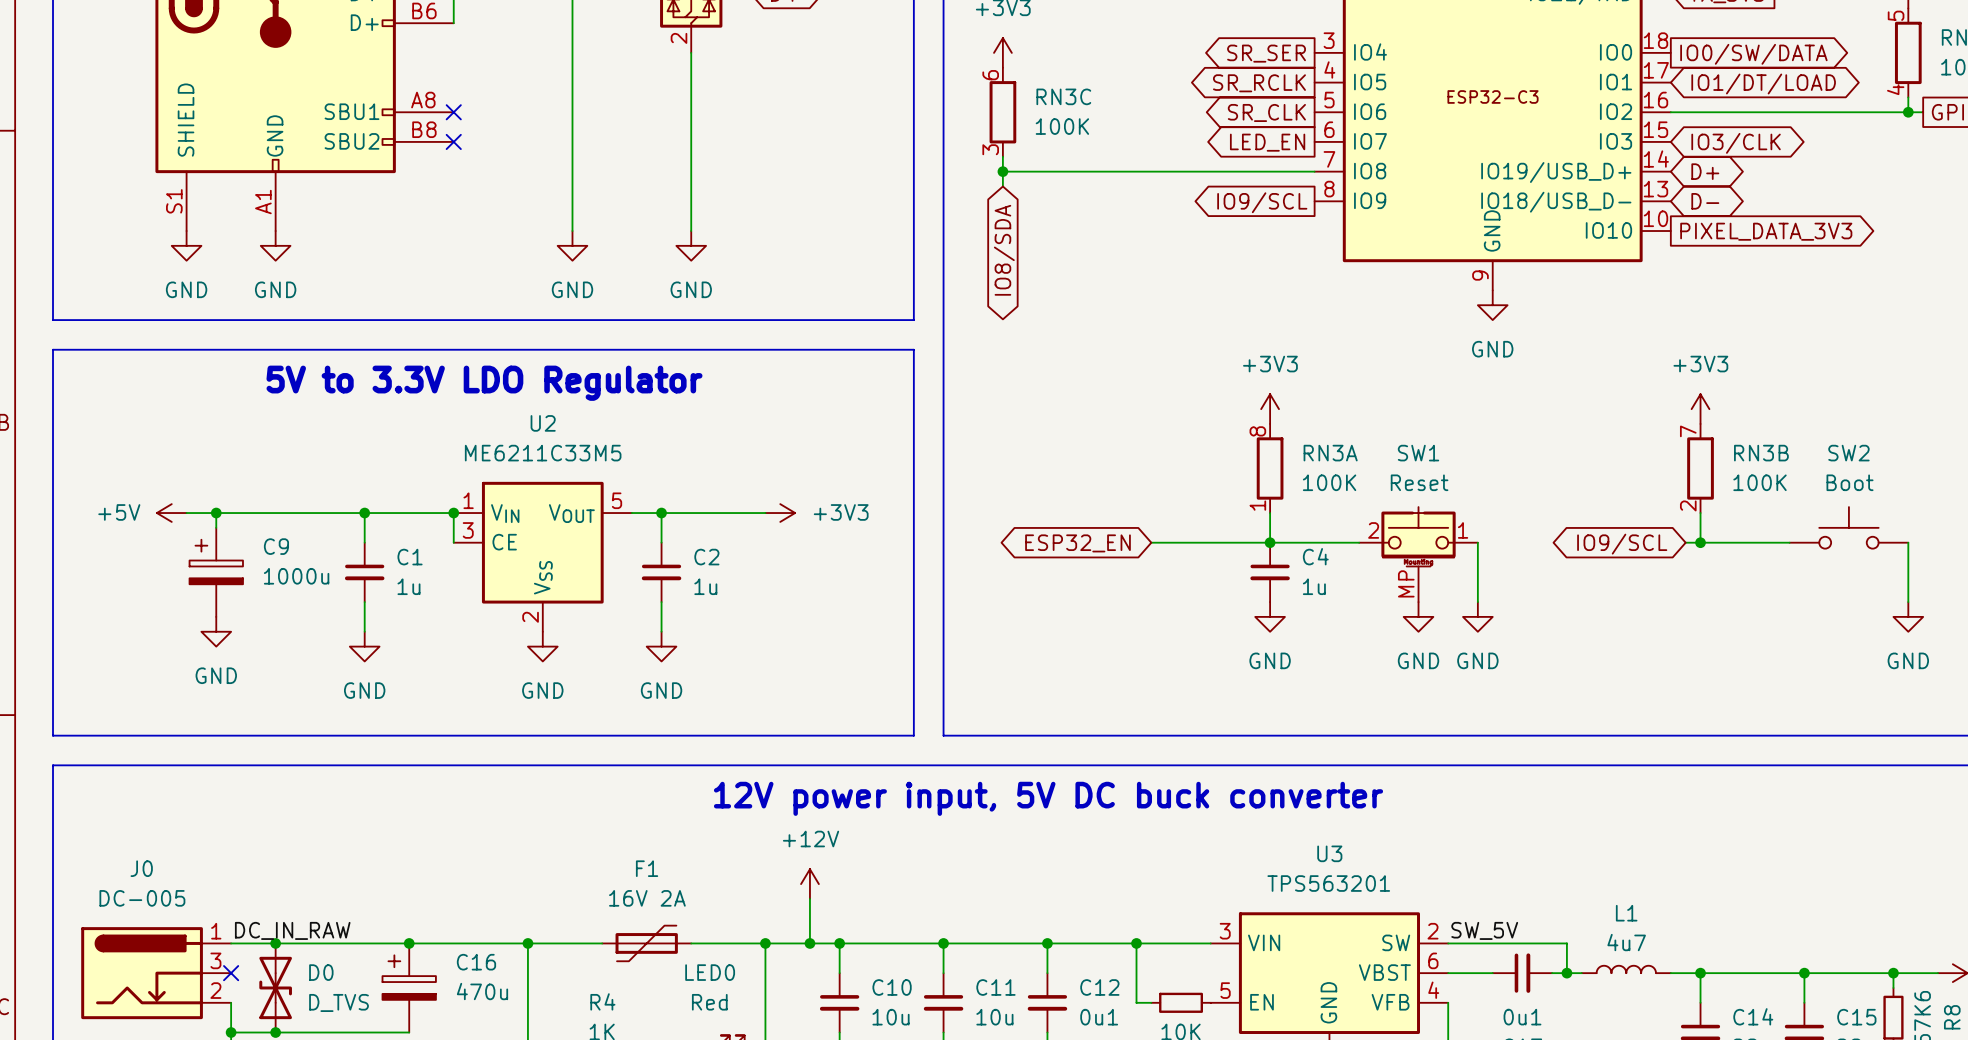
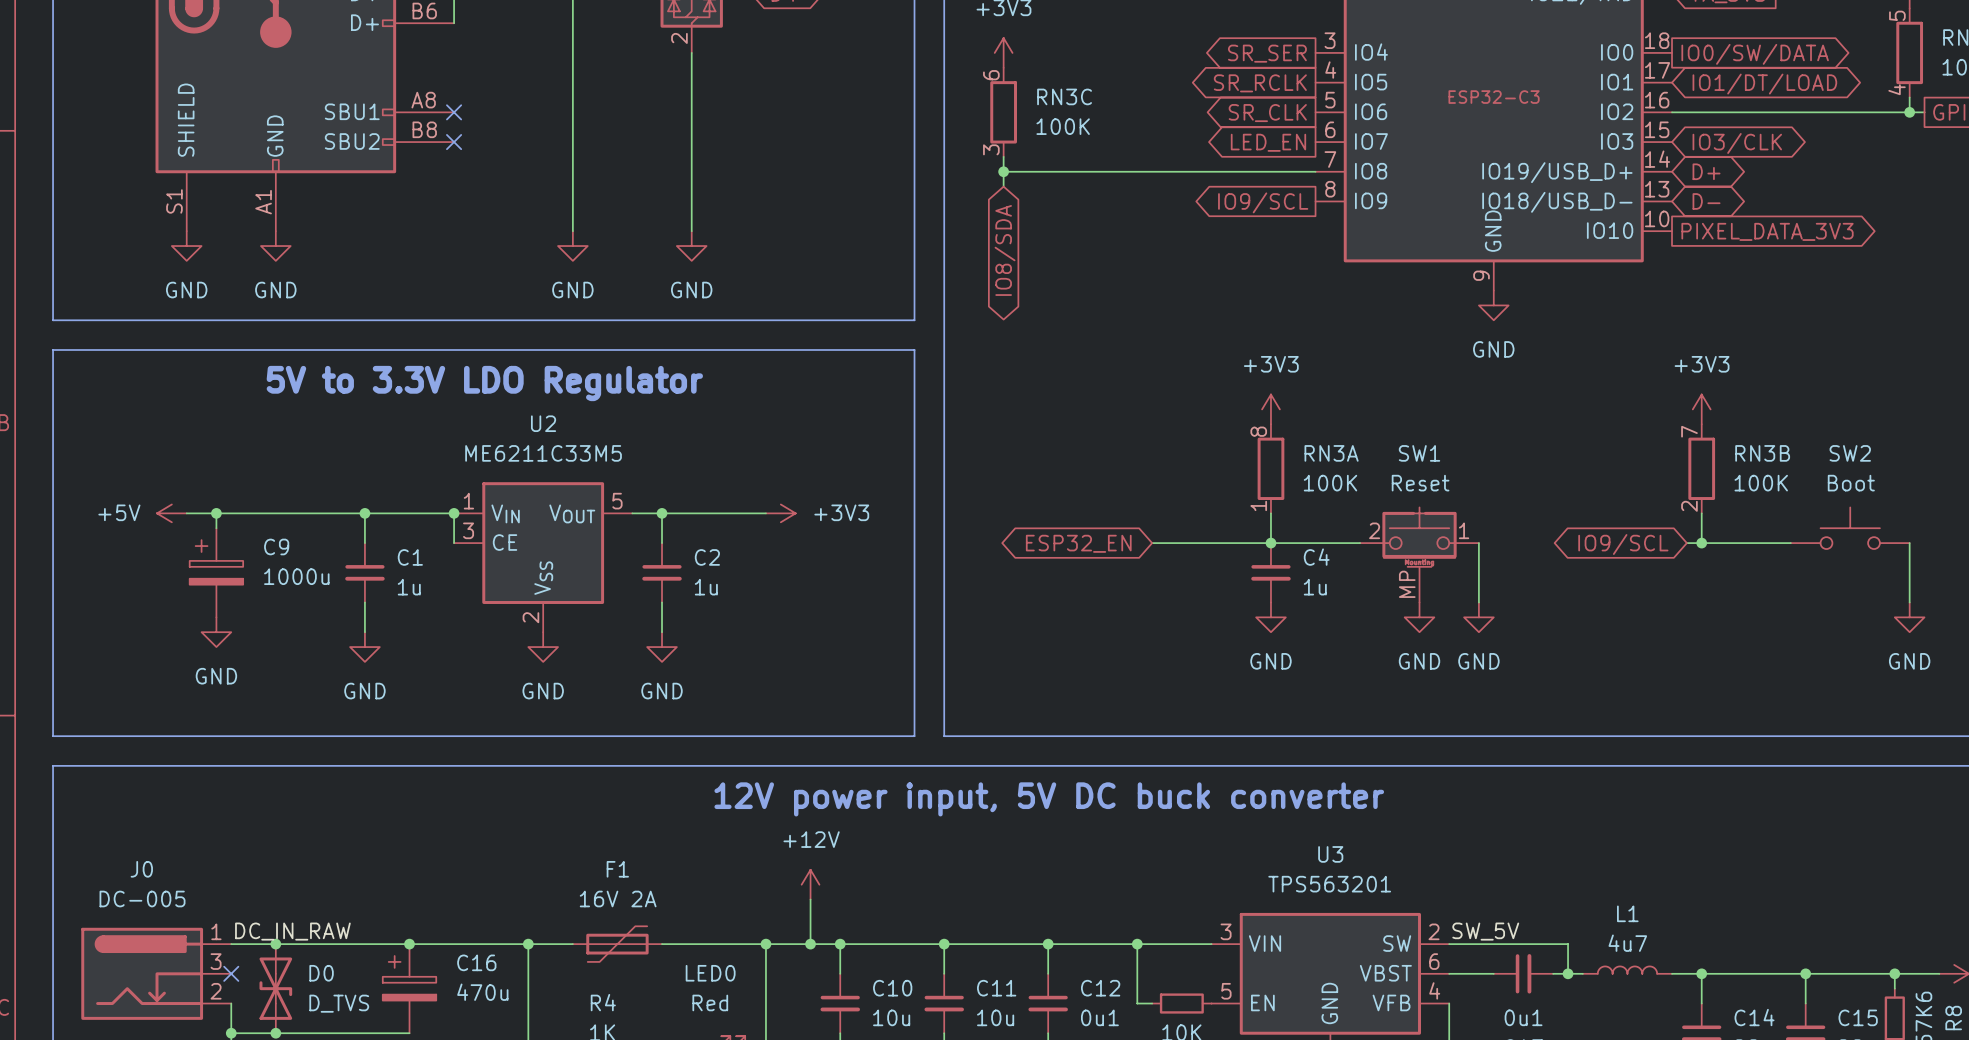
F1 position: (646, 943) -> (617, 944)

